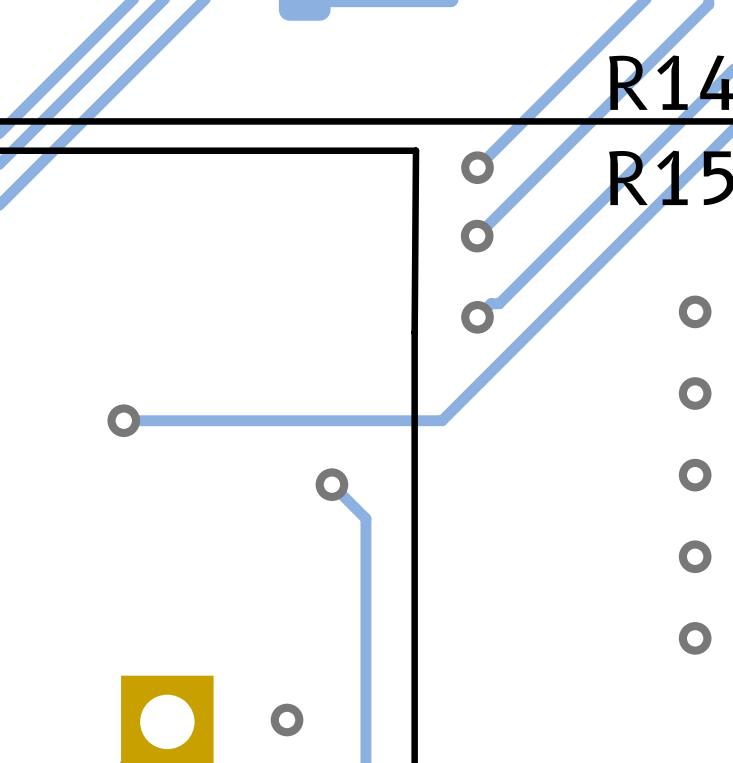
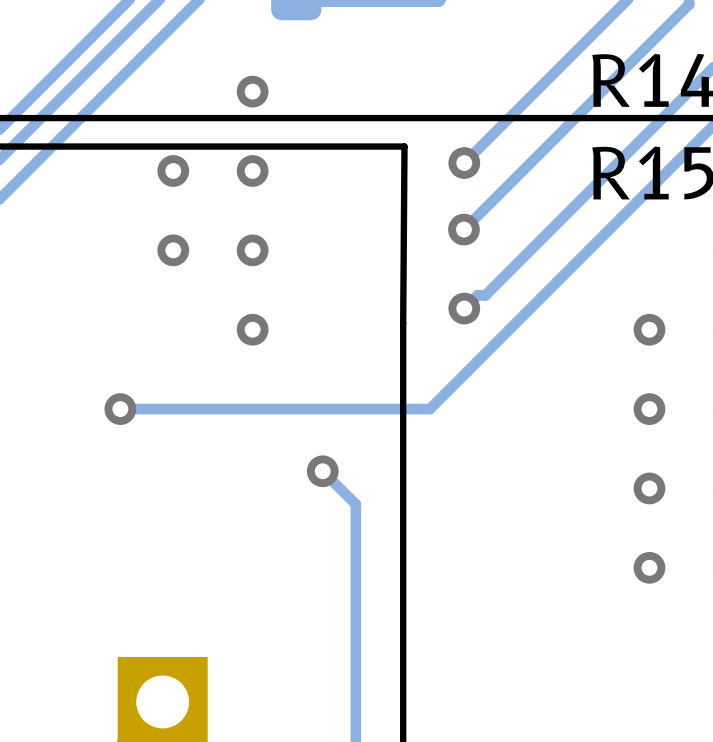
via: none -> (252, 91)
via: none -> (173, 170)
via: none -> (252, 170)
via: none -> (173, 250)
via: none -> (252, 250)
via position: (695, 311) -> (649, 329)
via: none -> (252, 329)
via position: (695, 393) -> (649, 409)
via position: (695, 475) -> (649, 488)
via position: (695, 556) -> (649, 567)
via: (695, 638) -> none
via: (287, 720) -> none

